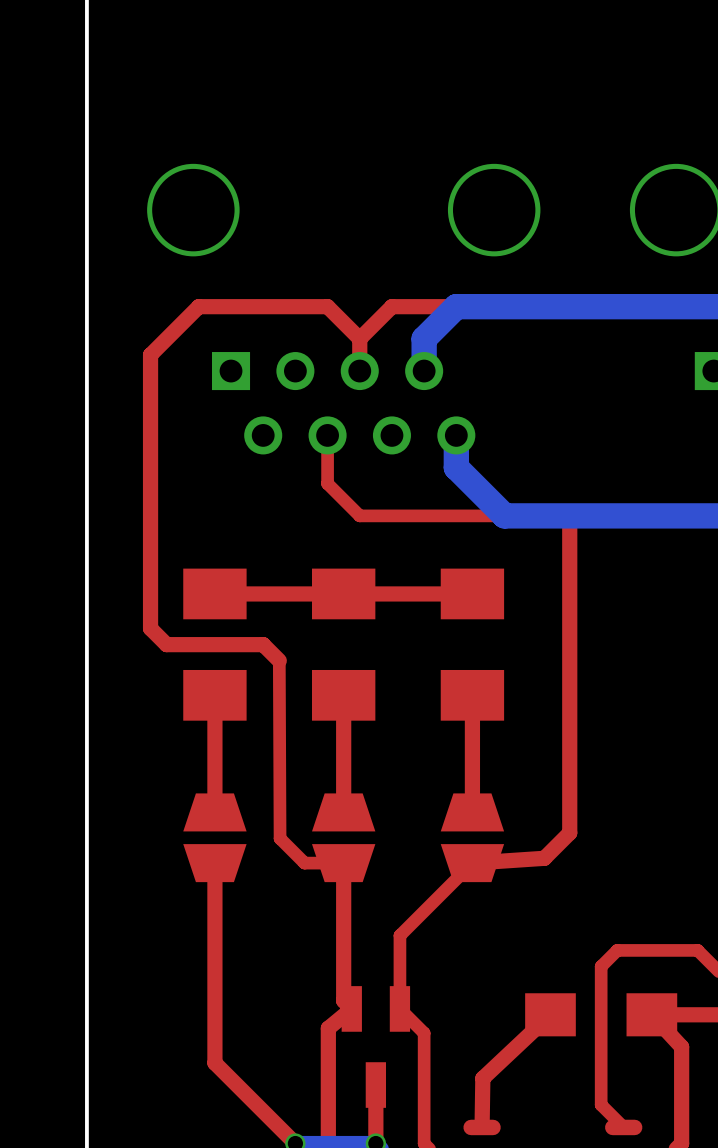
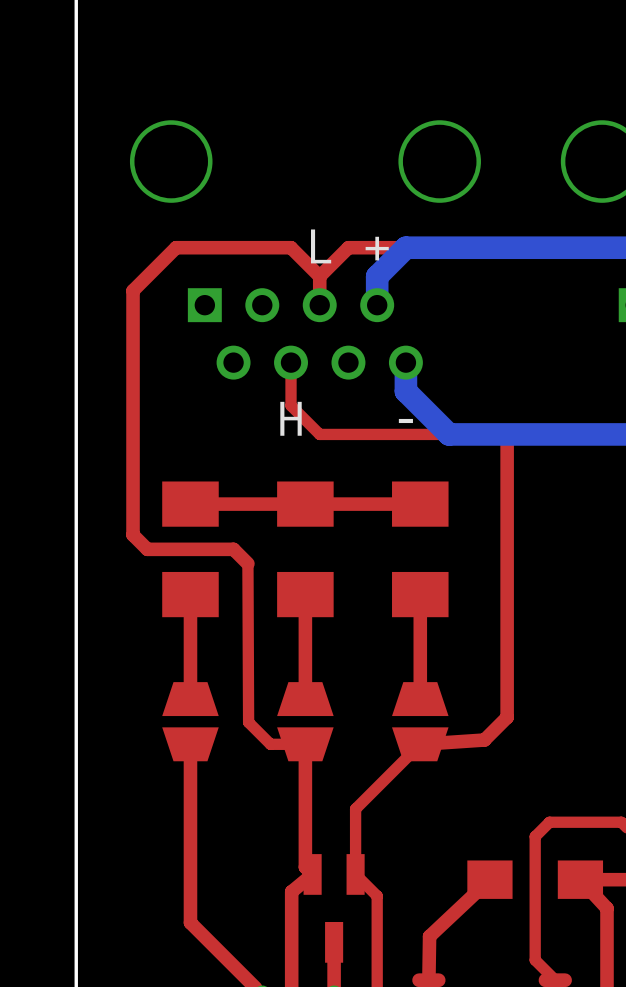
text: none -> L (321, 246)
text: none -> + (377, 248)
text: none -> H (291, 418)
text: none -> - (405, 420)

